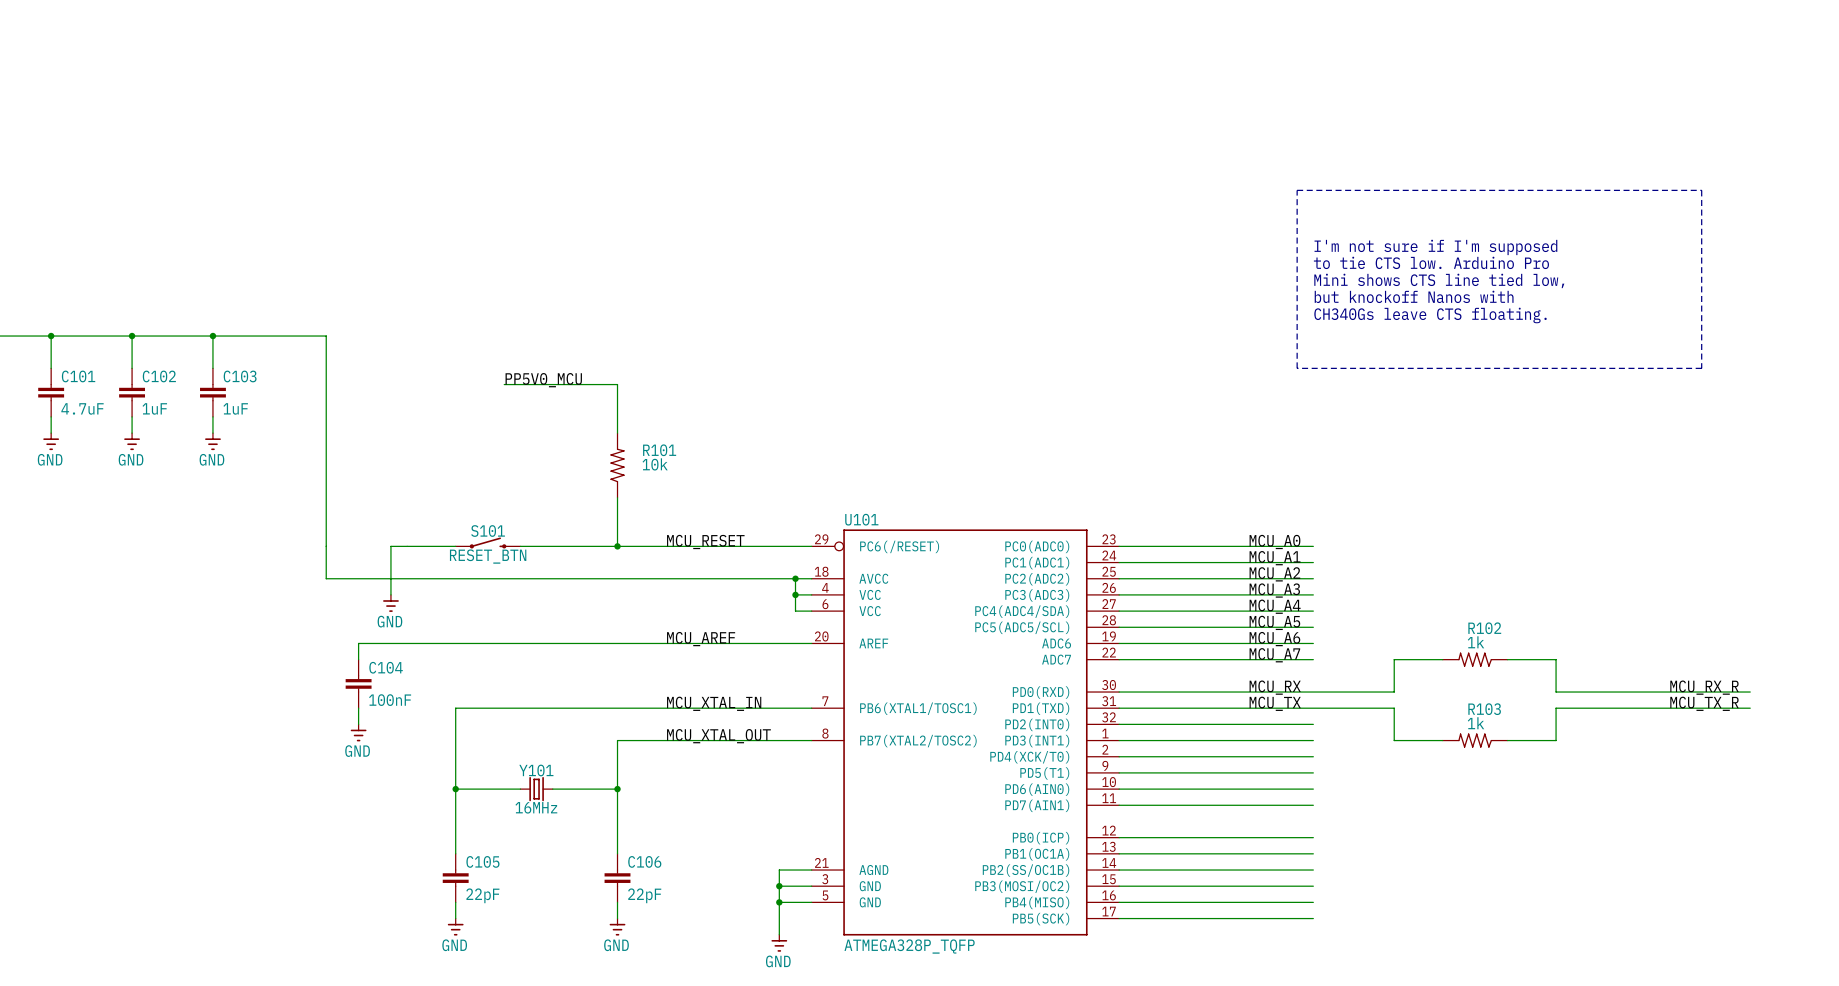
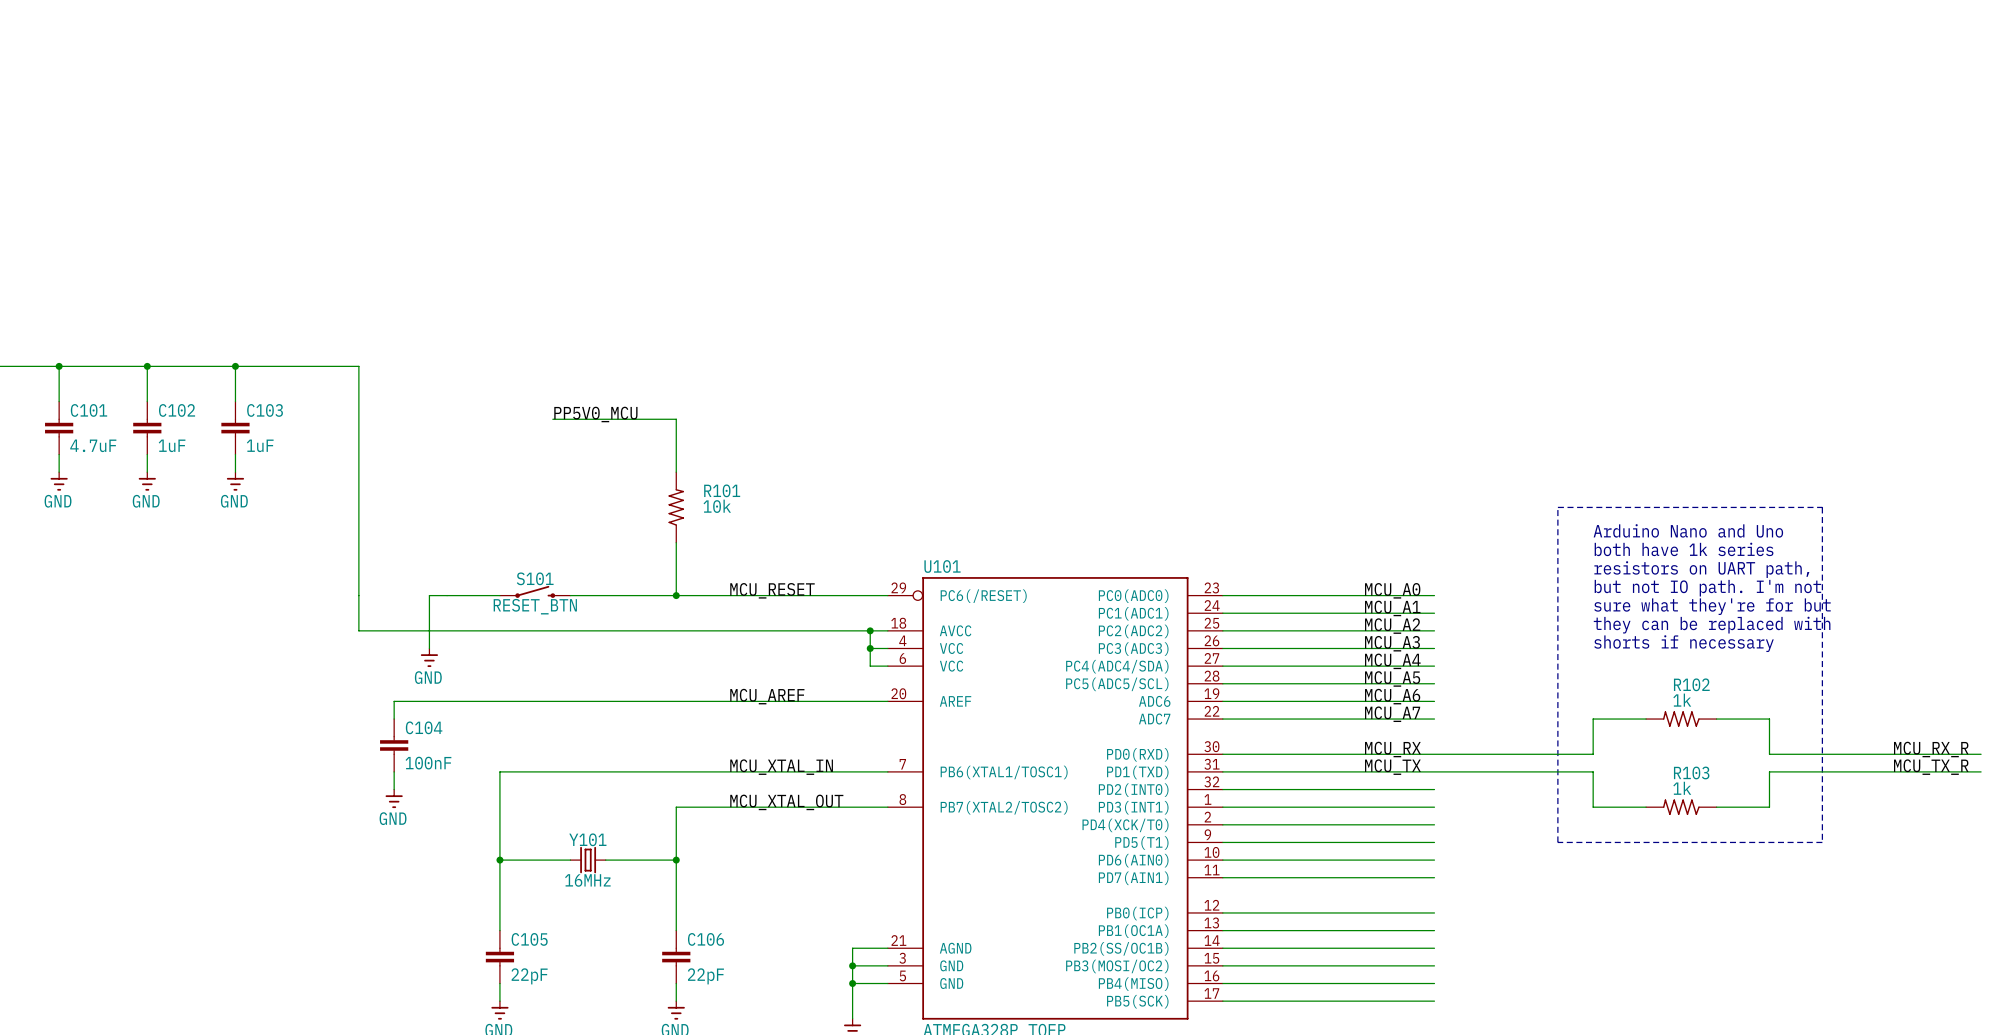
line: (1297, 190) (1297, 368) (1701, 368) (1701, 190) (1297, 190) -> none
text: I'm not sure if I'm supposed (1435, 247) -> none
text: to tie CTS low. Arduino Pro (1431, 262) -> none
text: Mini shows CTS line tied low, (1439, 280) -> none
text: but knockoff Nanos with (1414, 296) -> none
text: CH340Gs leave CTS floating. (1430, 315) -> none
line: none -> (1557, 507) (1557, 842) (1822, 842) (1822, 507) (1557, 507)
text: none -> Arduino Nano and Uno (1688, 530)
text: none -> both have 1k series (1684, 549)
text: none -> resistors on UART path, (1701, 569)
text: none -> but not IO path. I'm not (1707, 588)
text: none -> sure what they're for but (1712, 606)
text: none -> they can be replaced with (1712, 625)
text: none -> shorts if necessary (1683, 643)
wire: (1442, 659) (1394, 659) (1394, 692) -> (1646, 719) (1593, 719) (1593, 754) (1522, 754)
R102 position: (1475, 659) -> (1681, 719)
wire: (1507, 659) (1556, 659) (1556, 692) (1620, 692) -> (1716, 719) (1769, 719) (1769, 754)
label position: MCU_RX_R (1704, 687) -> MCU_RX_R (1931, 749)
wire: none -> (1910, 754) (1981, 754)
label position: MCU_TX_R (1704, 703) -> MCU_TX_R (1931, 767)
wire: (1394, 708) (1394, 740) (1442, 740) -> (1522, 771) (1593, 771) (1593, 807) (1646, 807)
wire: (1620, 708) (1556, 708) (1556, 740) (1507, 740) -> (1769, 771) (1769, 807) (1716, 807)
wire: none -> (1910, 771) (1981, 771)
R103 position: (1475, 740) -> (1681, 807)

